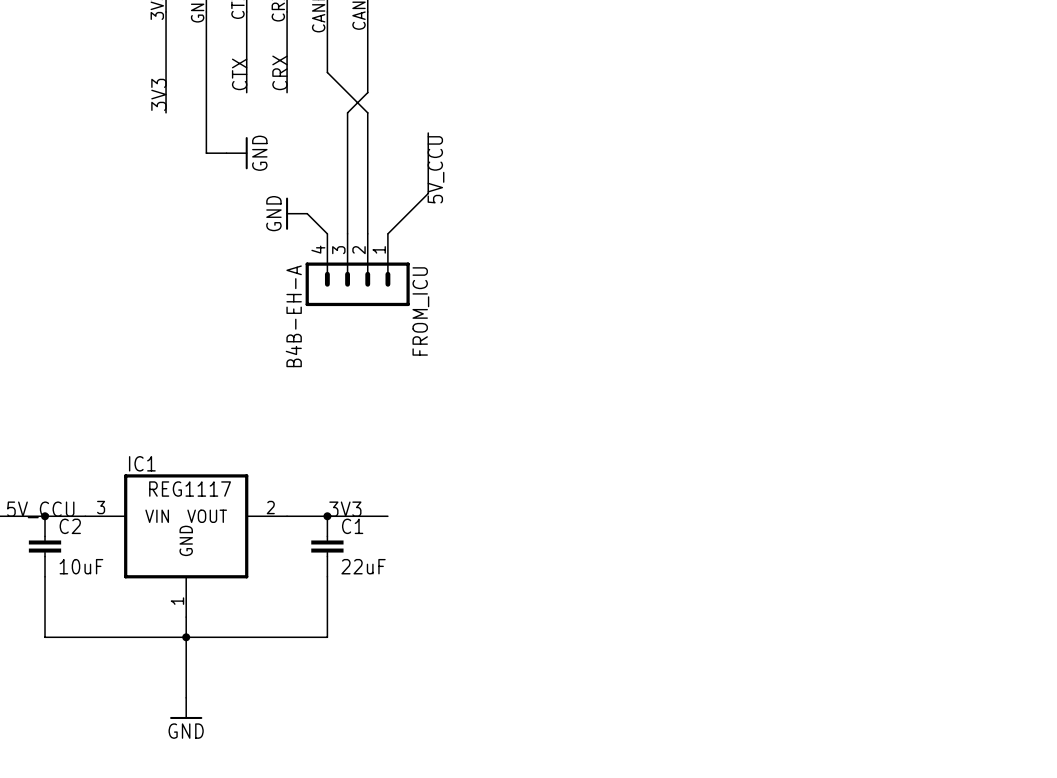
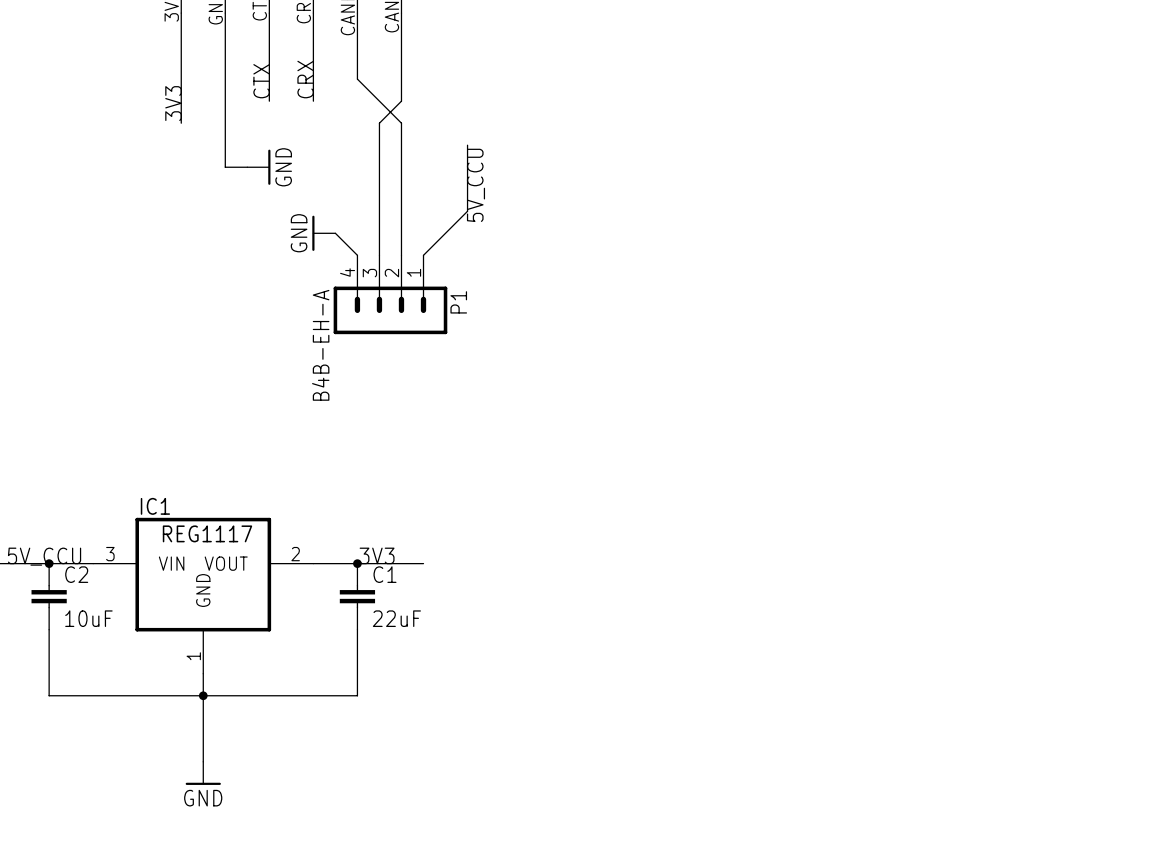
FROM_ICU name: FROM_ICU (420, 311) -> P1 (458, 302)

